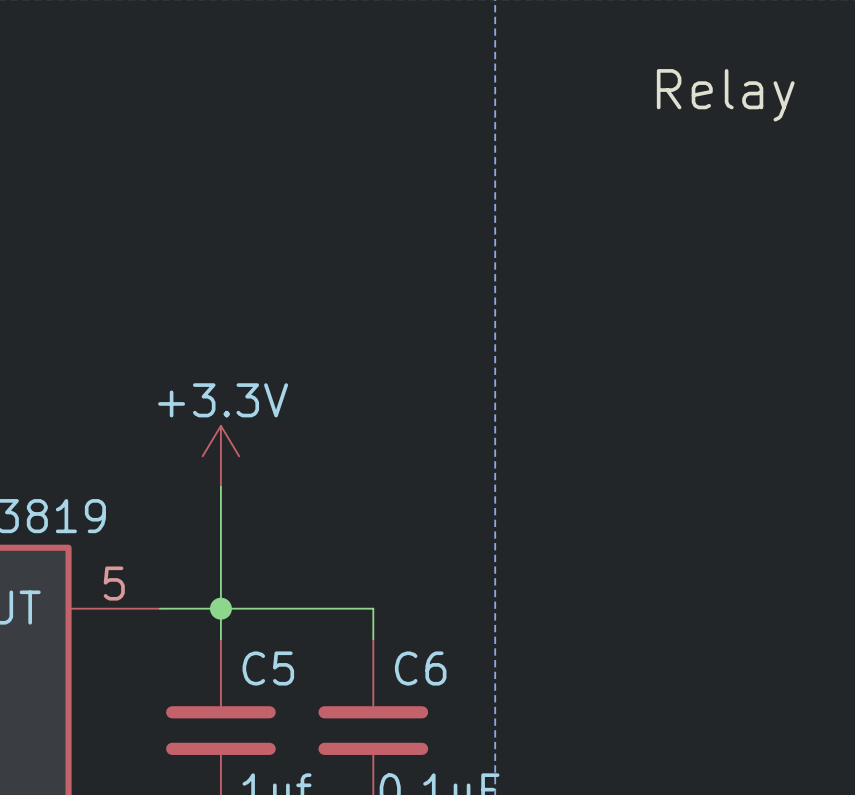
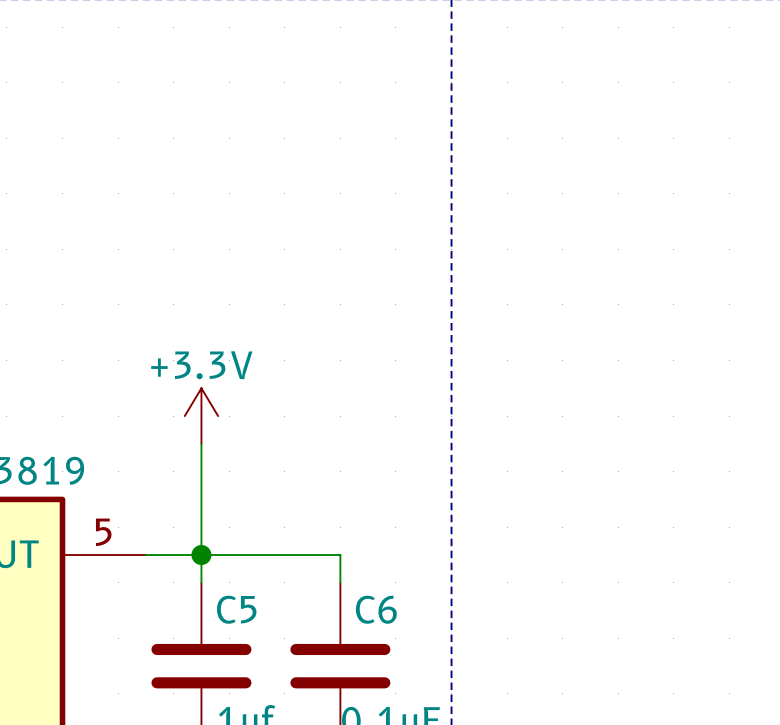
label: Relay (725, 95) -> none

